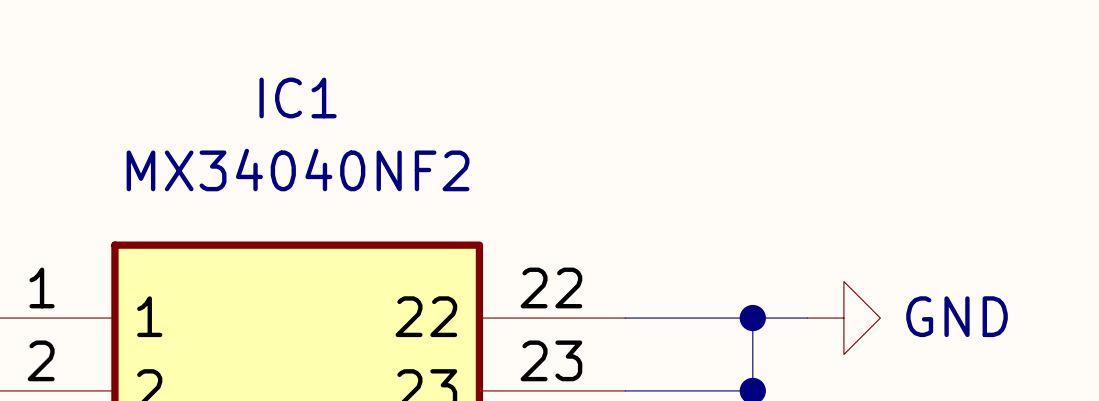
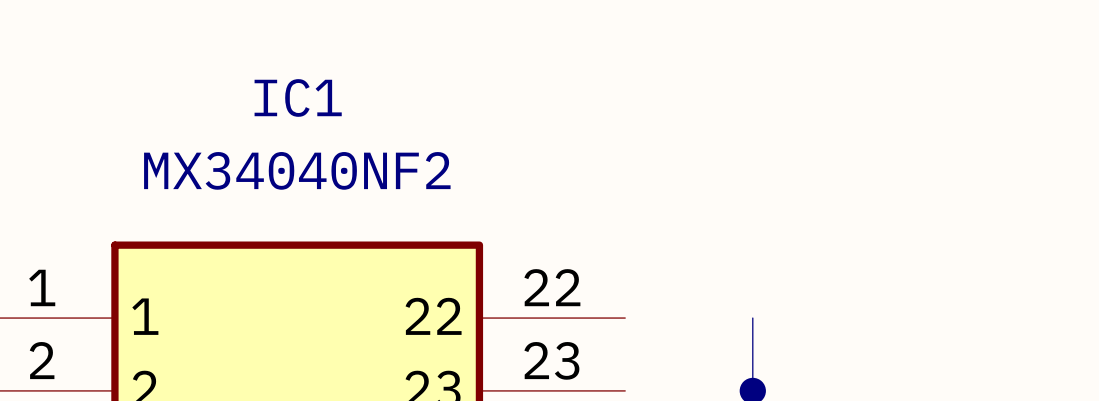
wire: (625, 318) (807, 318) -> none
junction: (752, 318) -> none
power symbol: GND (843, 318) -> none
wire: (625, 390) (752, 390) -> none

